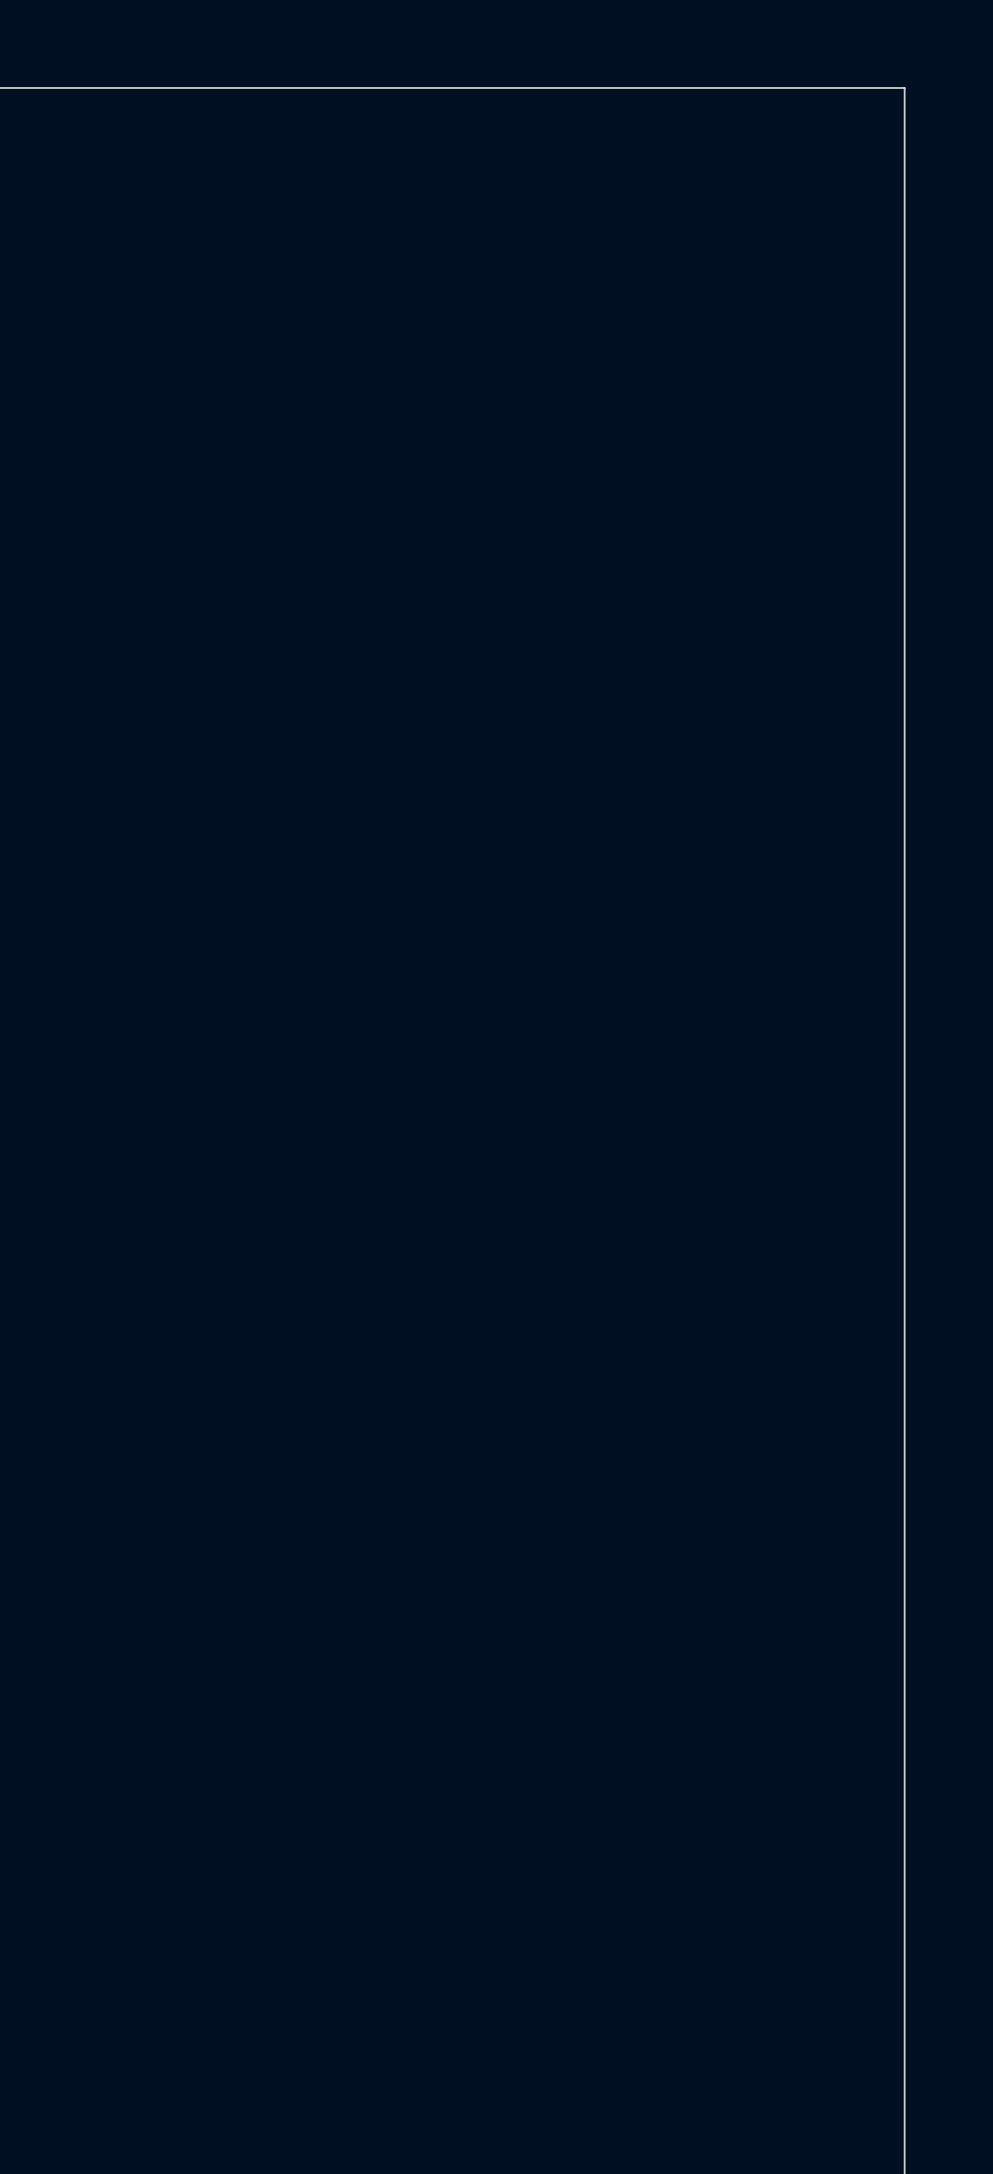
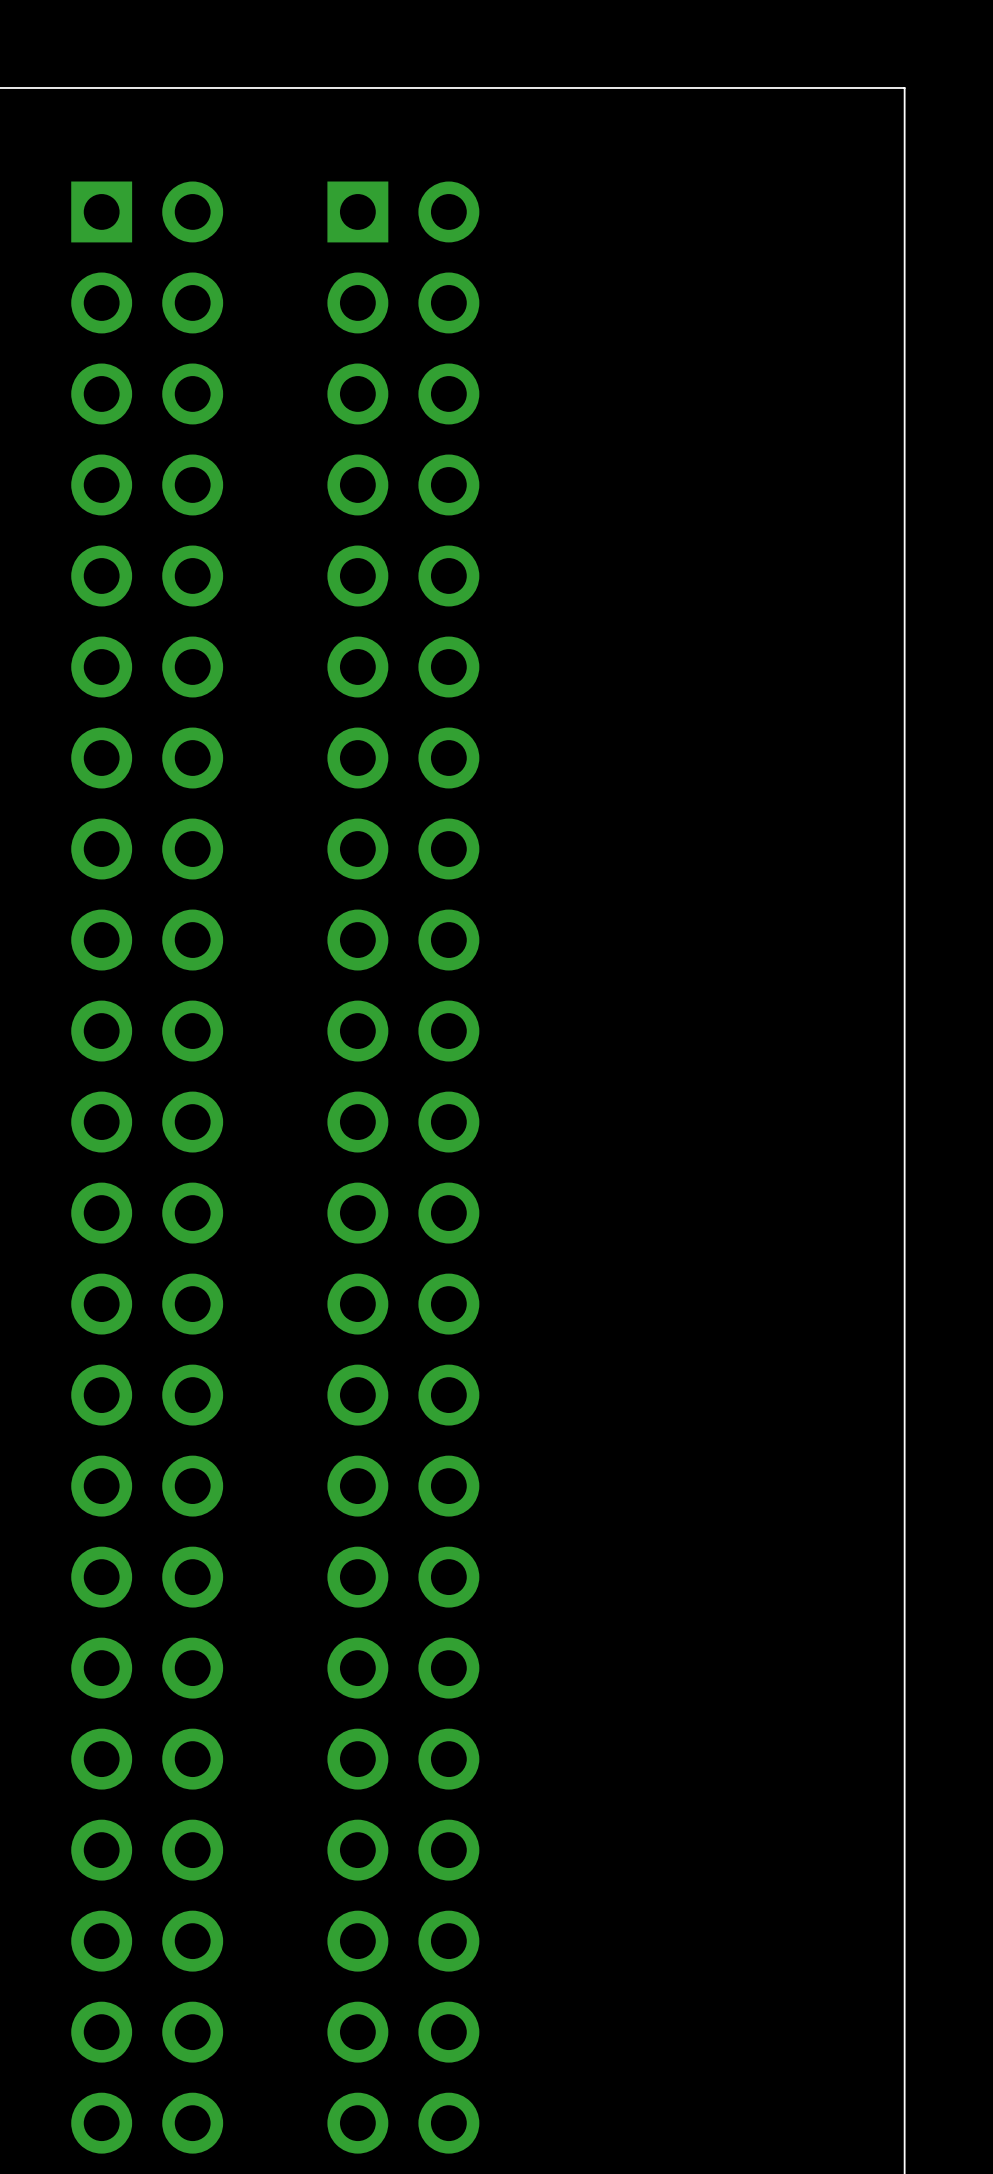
part: none -> (147, 1167)
part: none -> (403, 1167)

